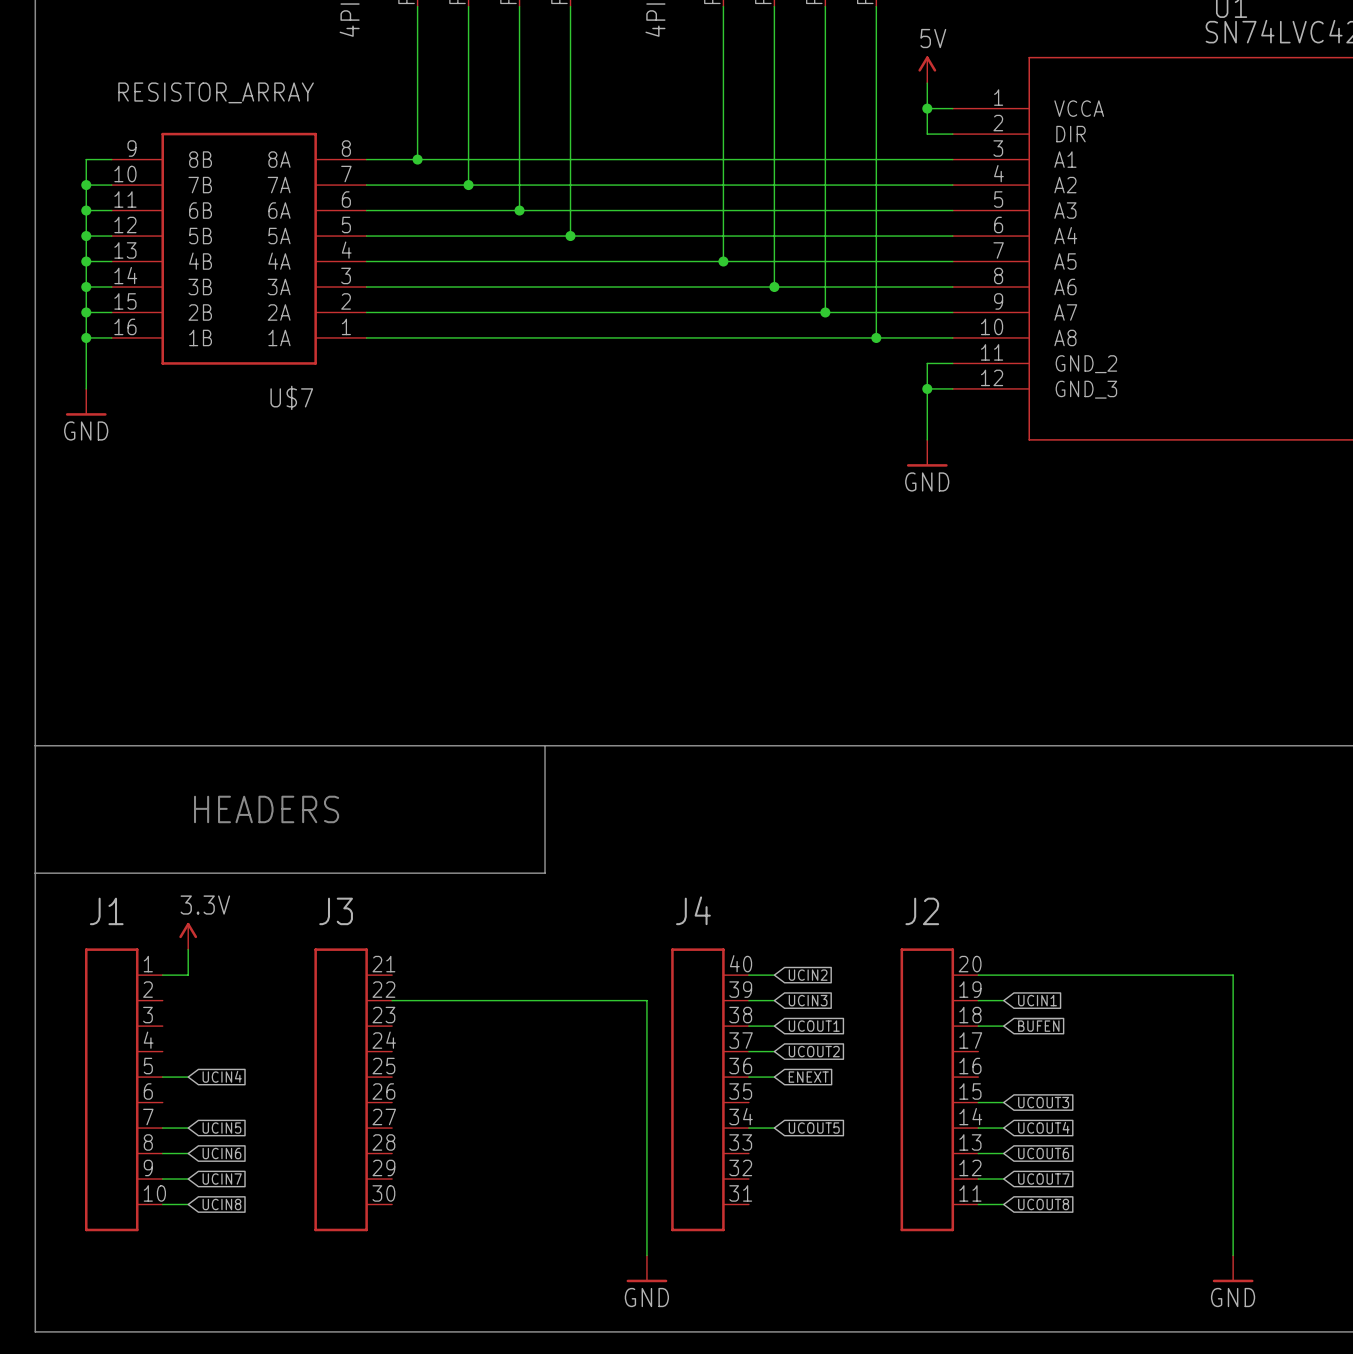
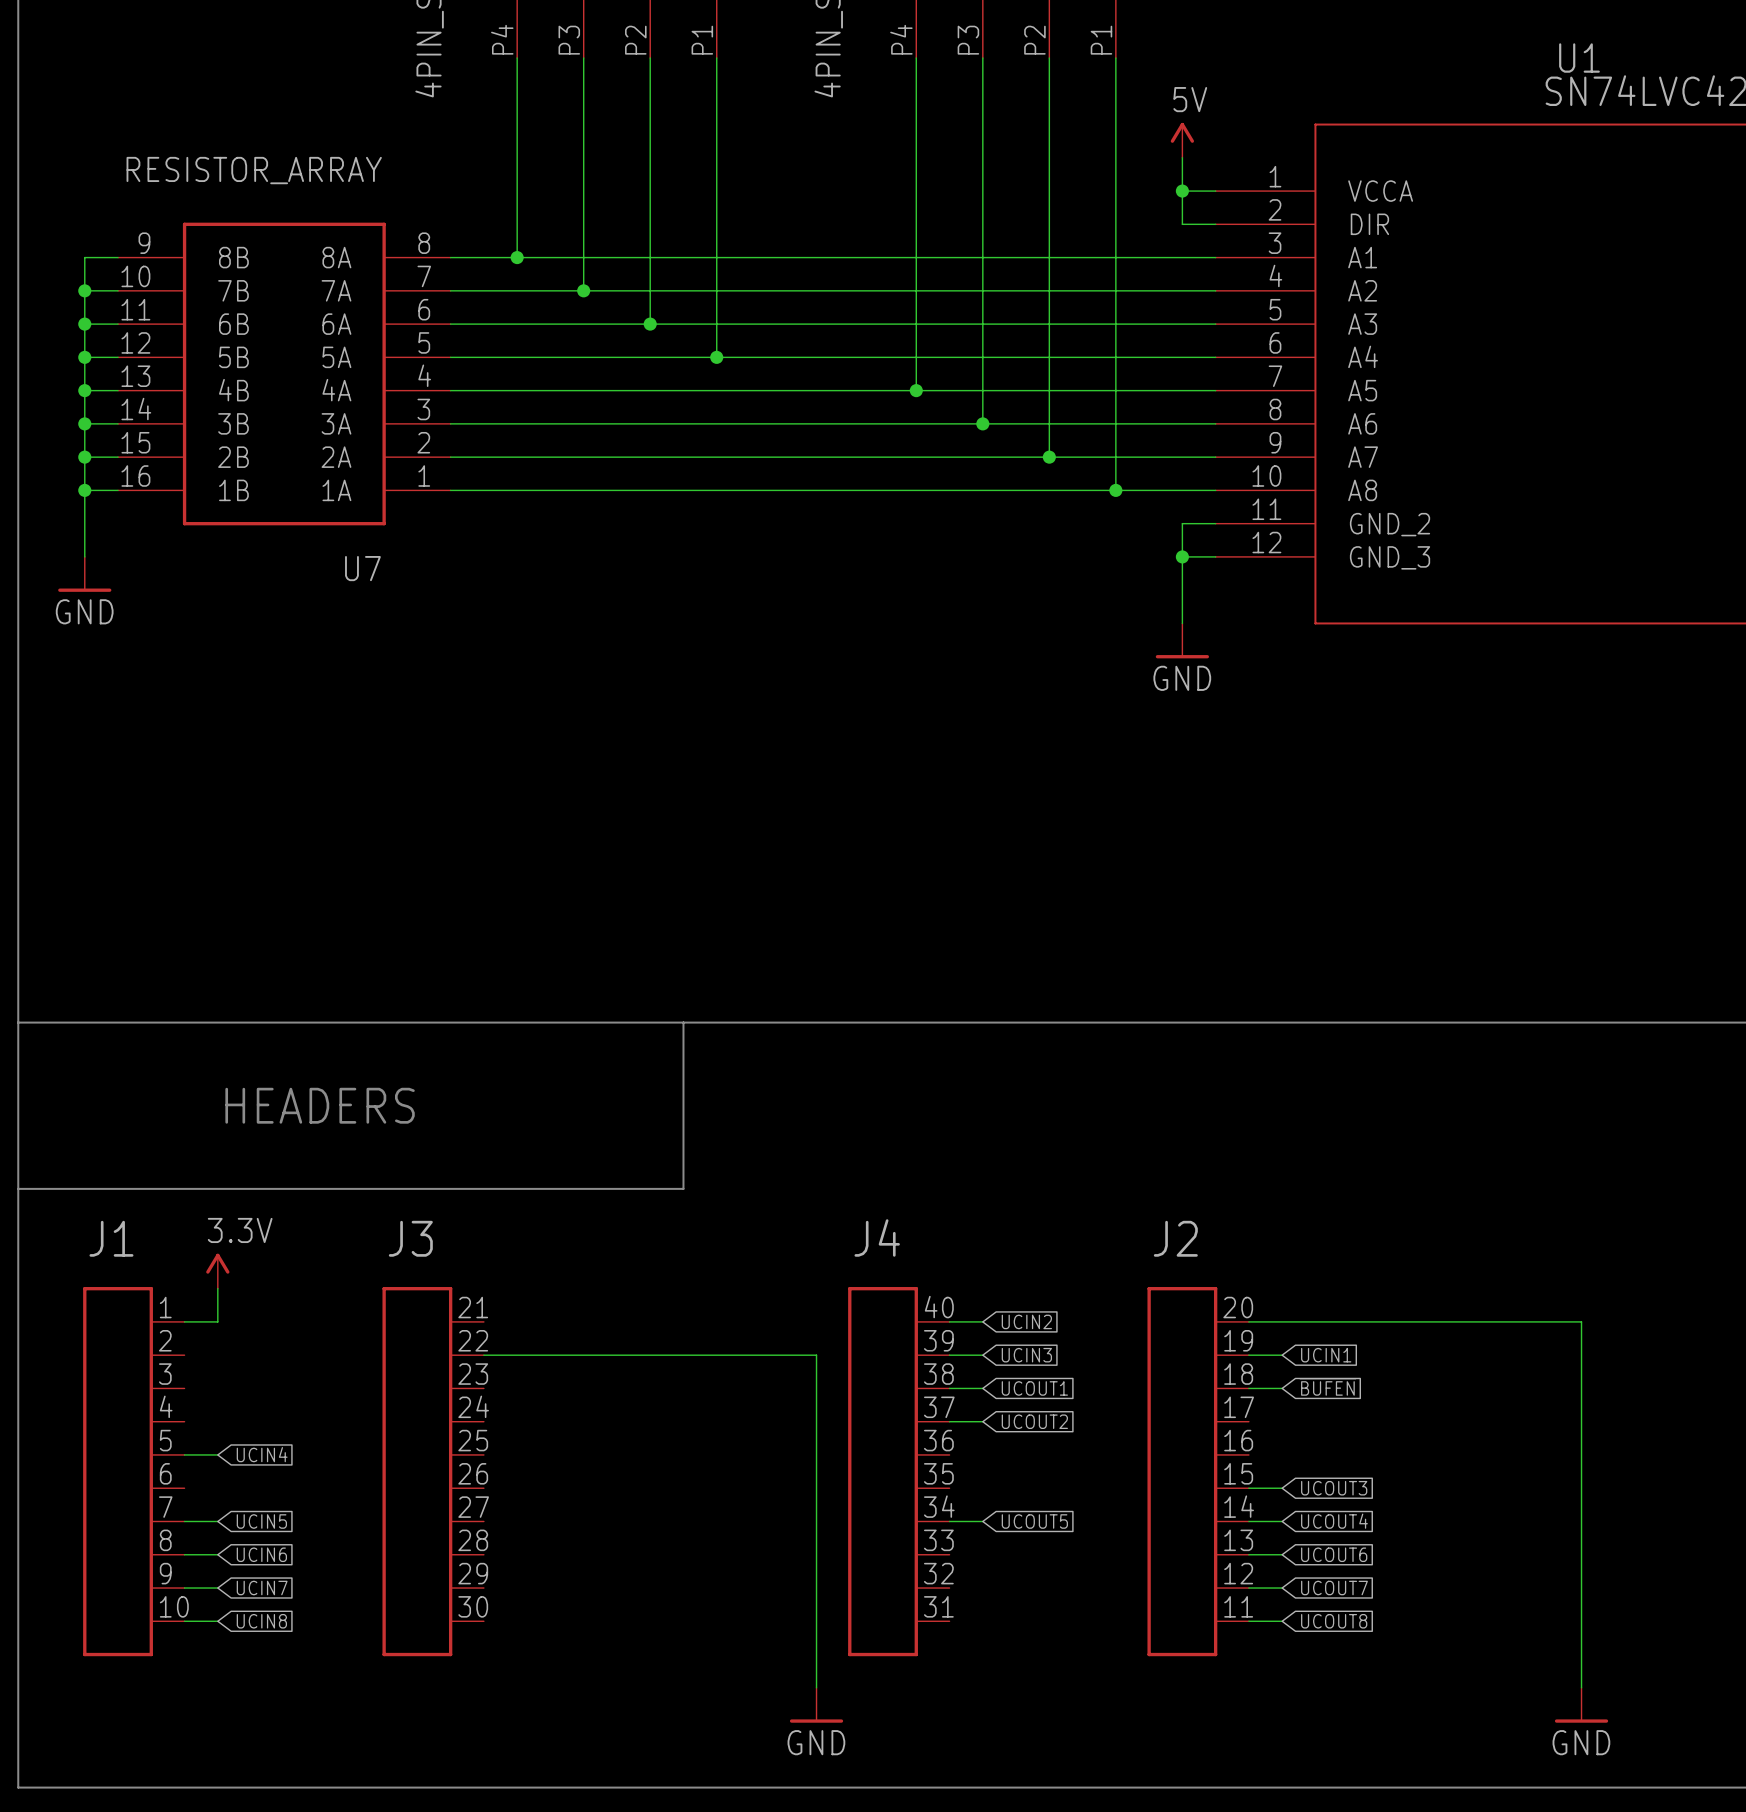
U$7 name: U$7 (291, 397) -> U7 (362, 568)
wire: (748, 1077) (774, 1077) -> none
global label: ENEXT (808, 1077) -> none

